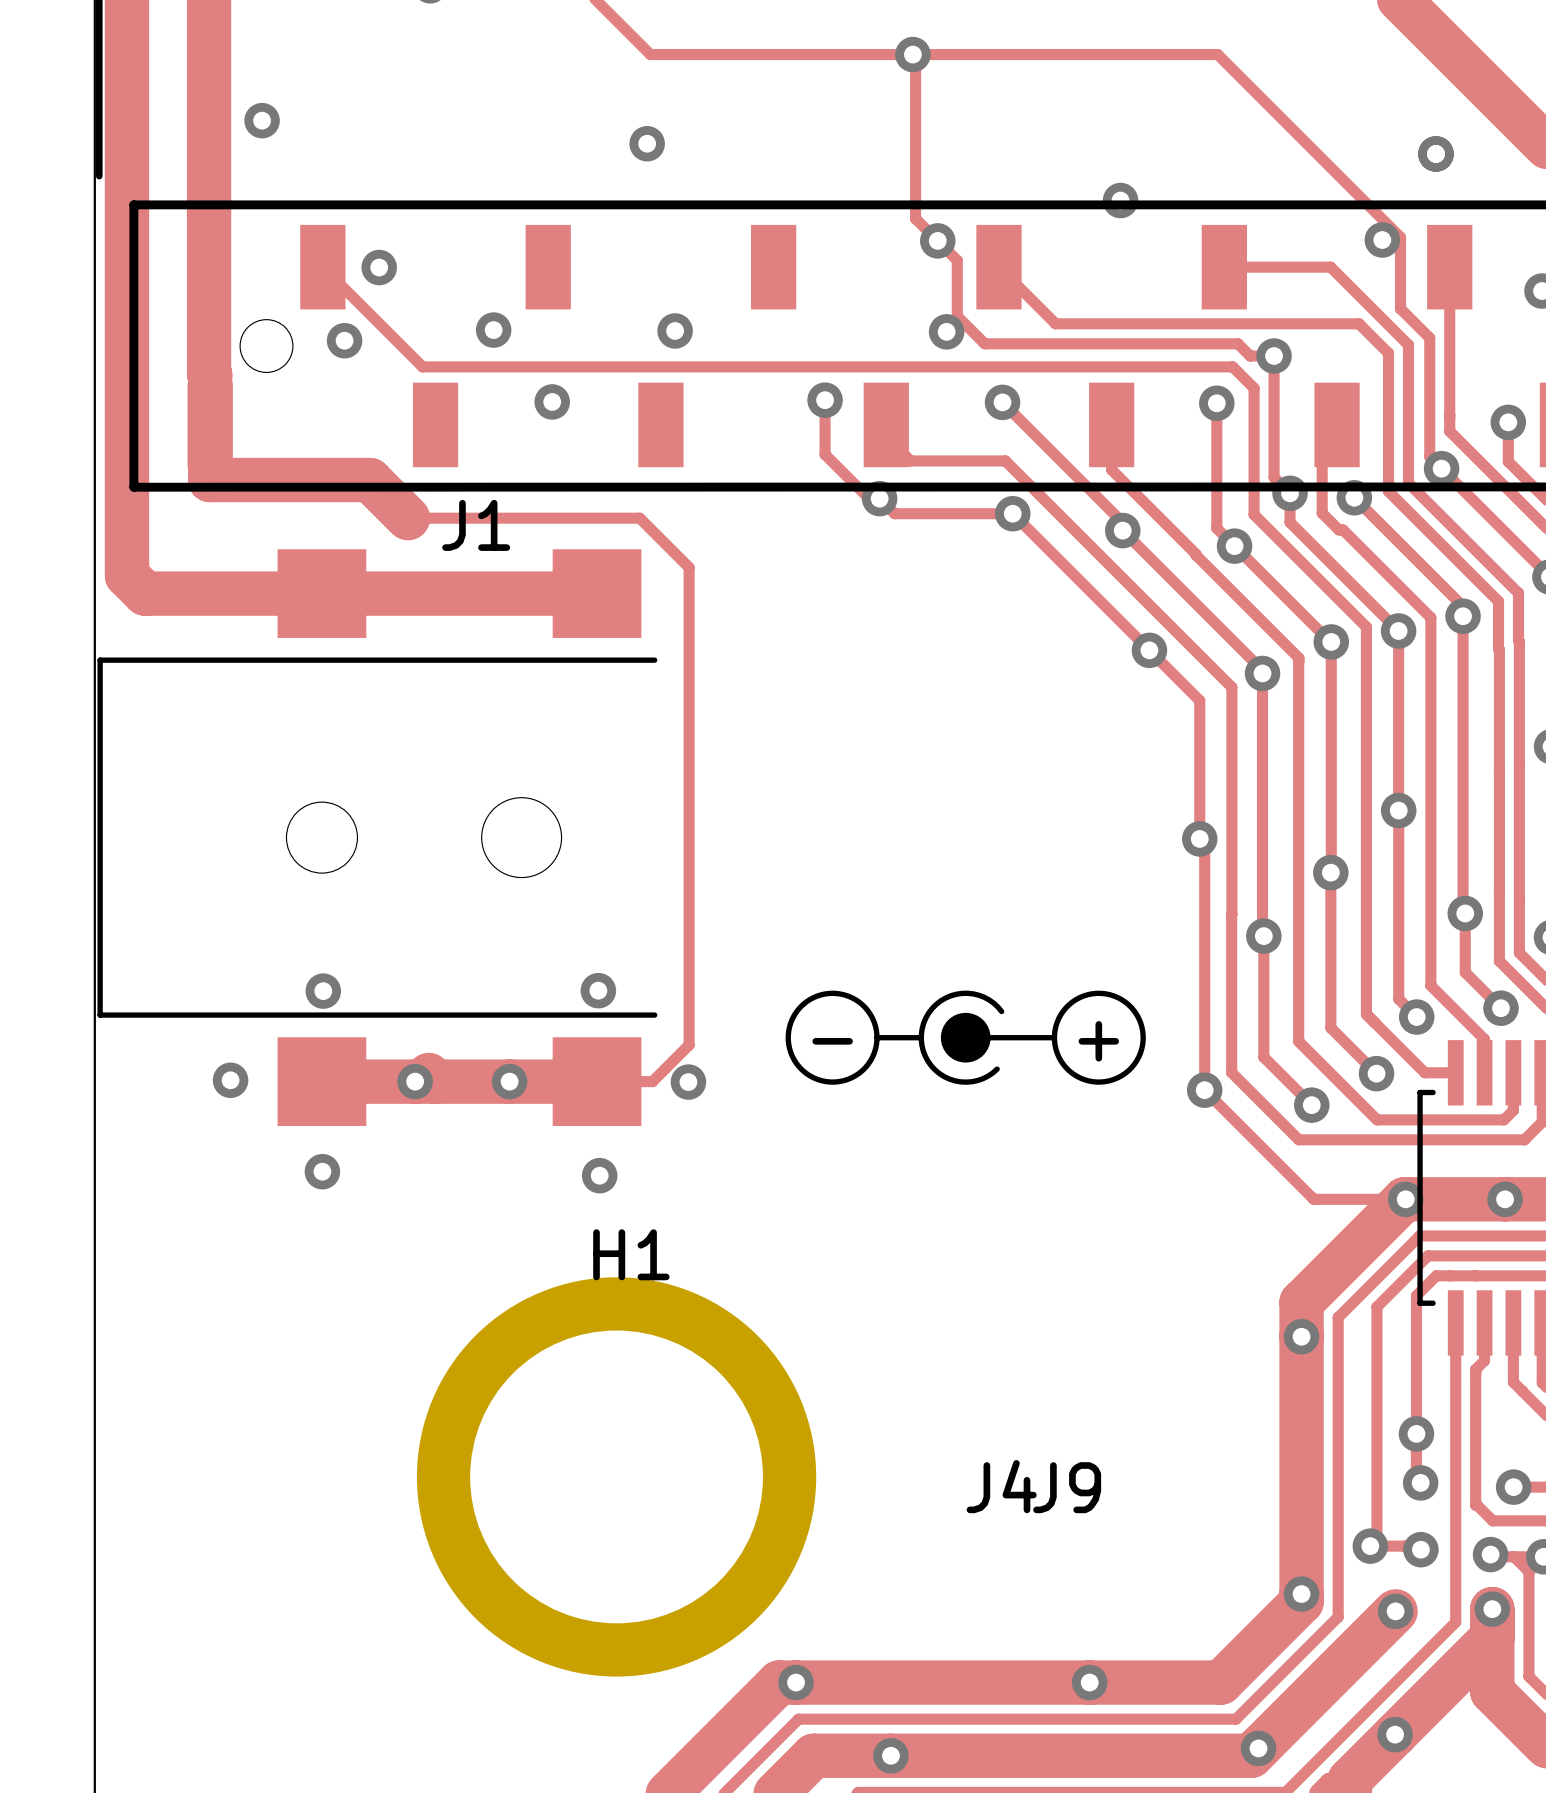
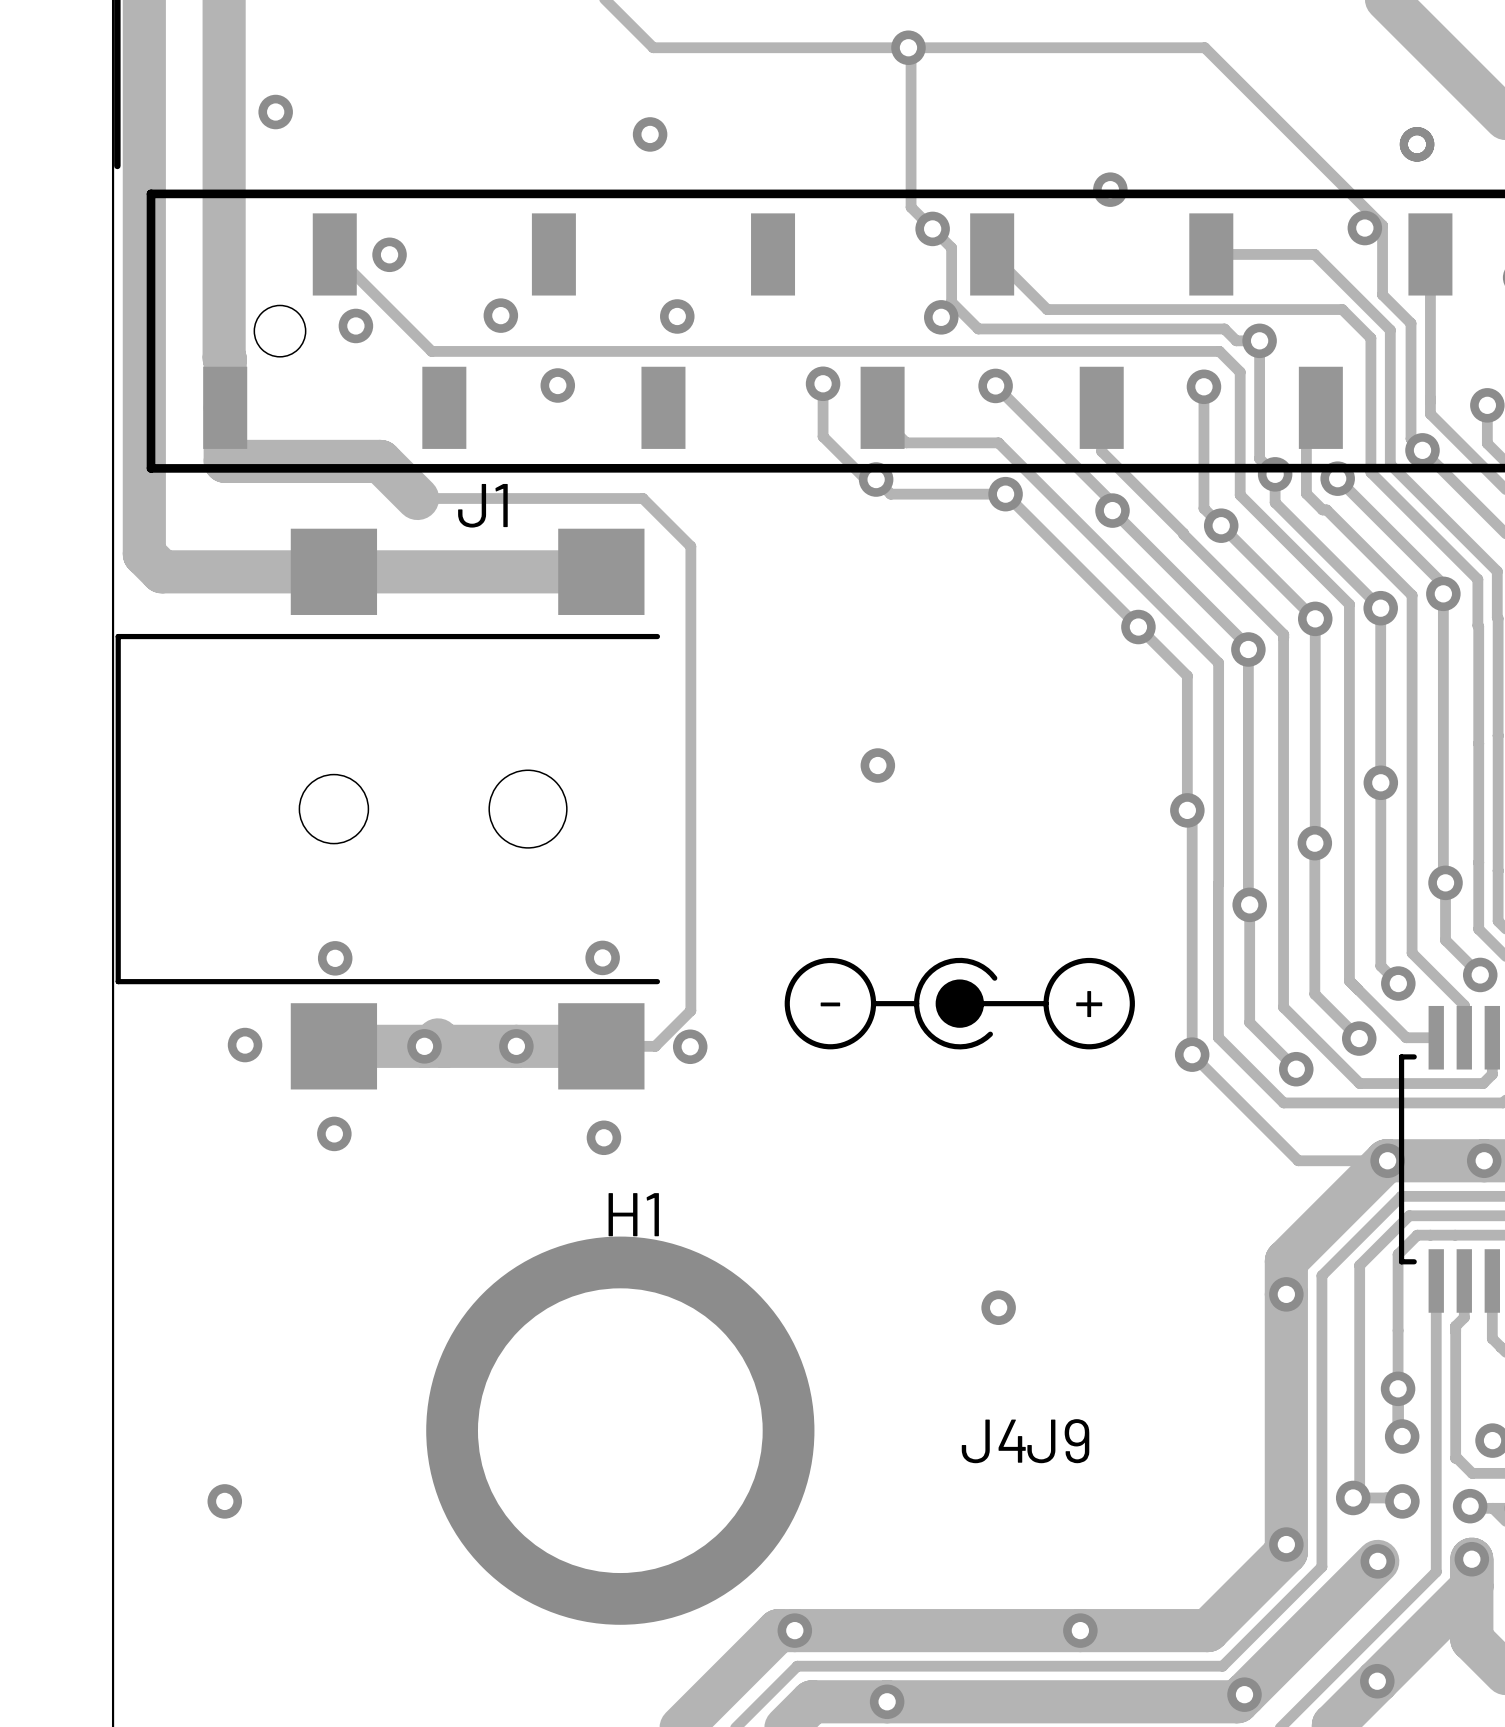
via: none -> (877, 765)
via: none -> (998, 1307)
via: none -> (224, 1501)

